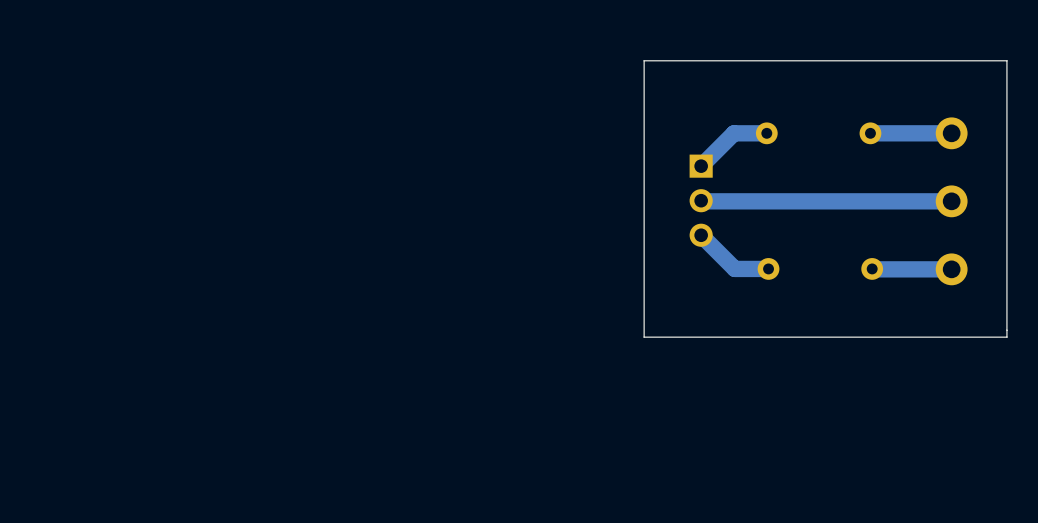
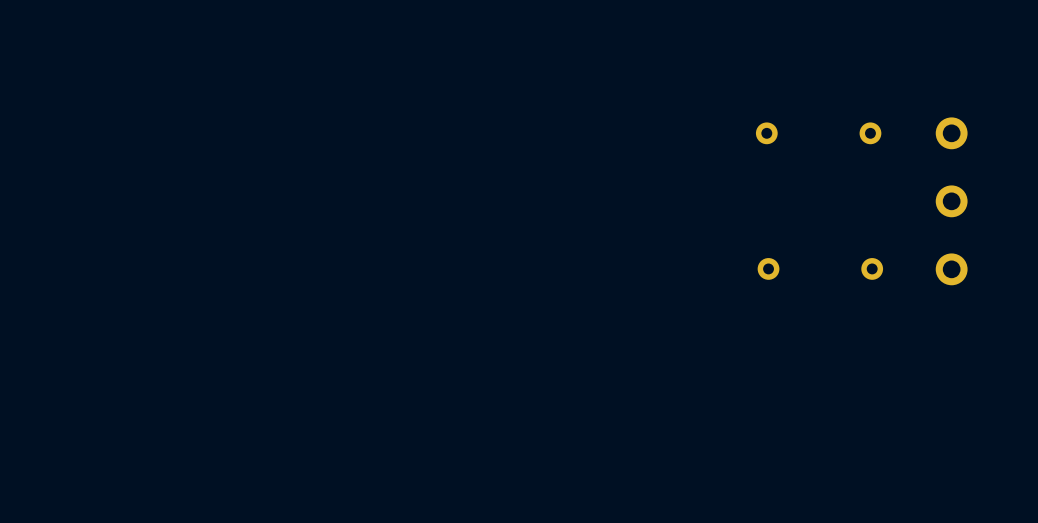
board edge: (1006, 60) (644, 60) (644, 337) (1006, 337) (1006, 60) -> none
bottom track: (766, 133) (733, 133) (701, 166) -> none
bottom track: (944, 133) (870, 133) -> none
bottom track: (701, 200) (944, 201) -> none
part: (701, 200) -> none
bottom track: (701, 235) (734, 268) (768, 268) -> none
bottom track: (872, 268) (944, 269) -> none

